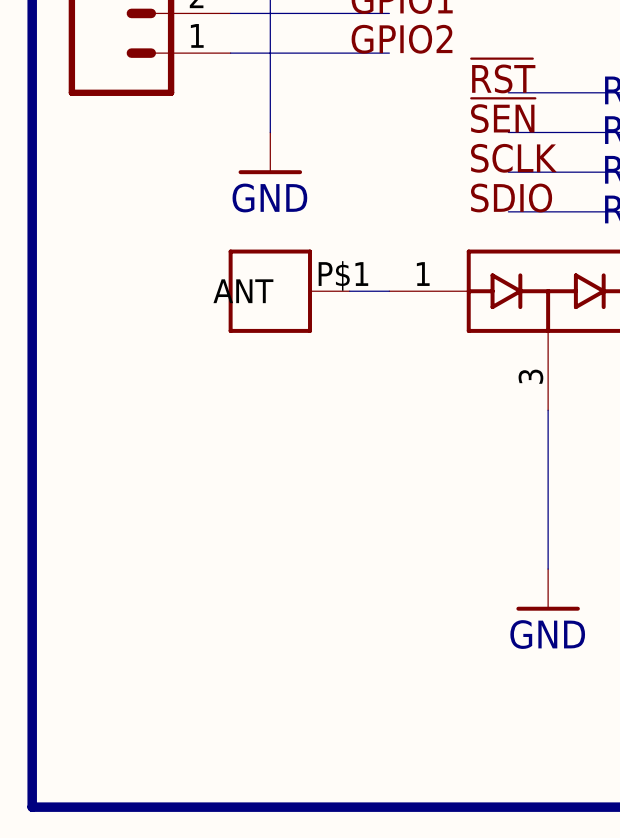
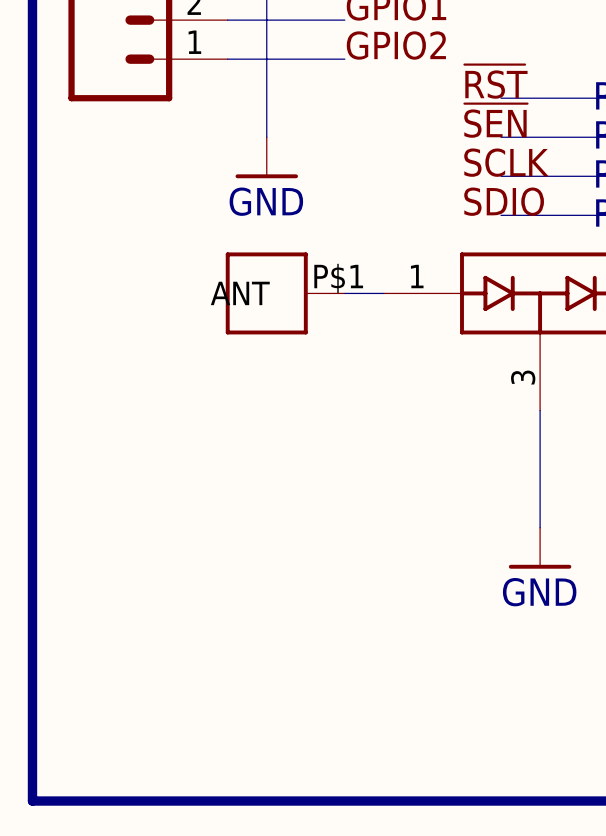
wire: (349, 13) (389, 13) -> none
wire: (349, 53) (389, 53) -> none
power symbol position: GND (548, 589) -> GND (540, 548)

